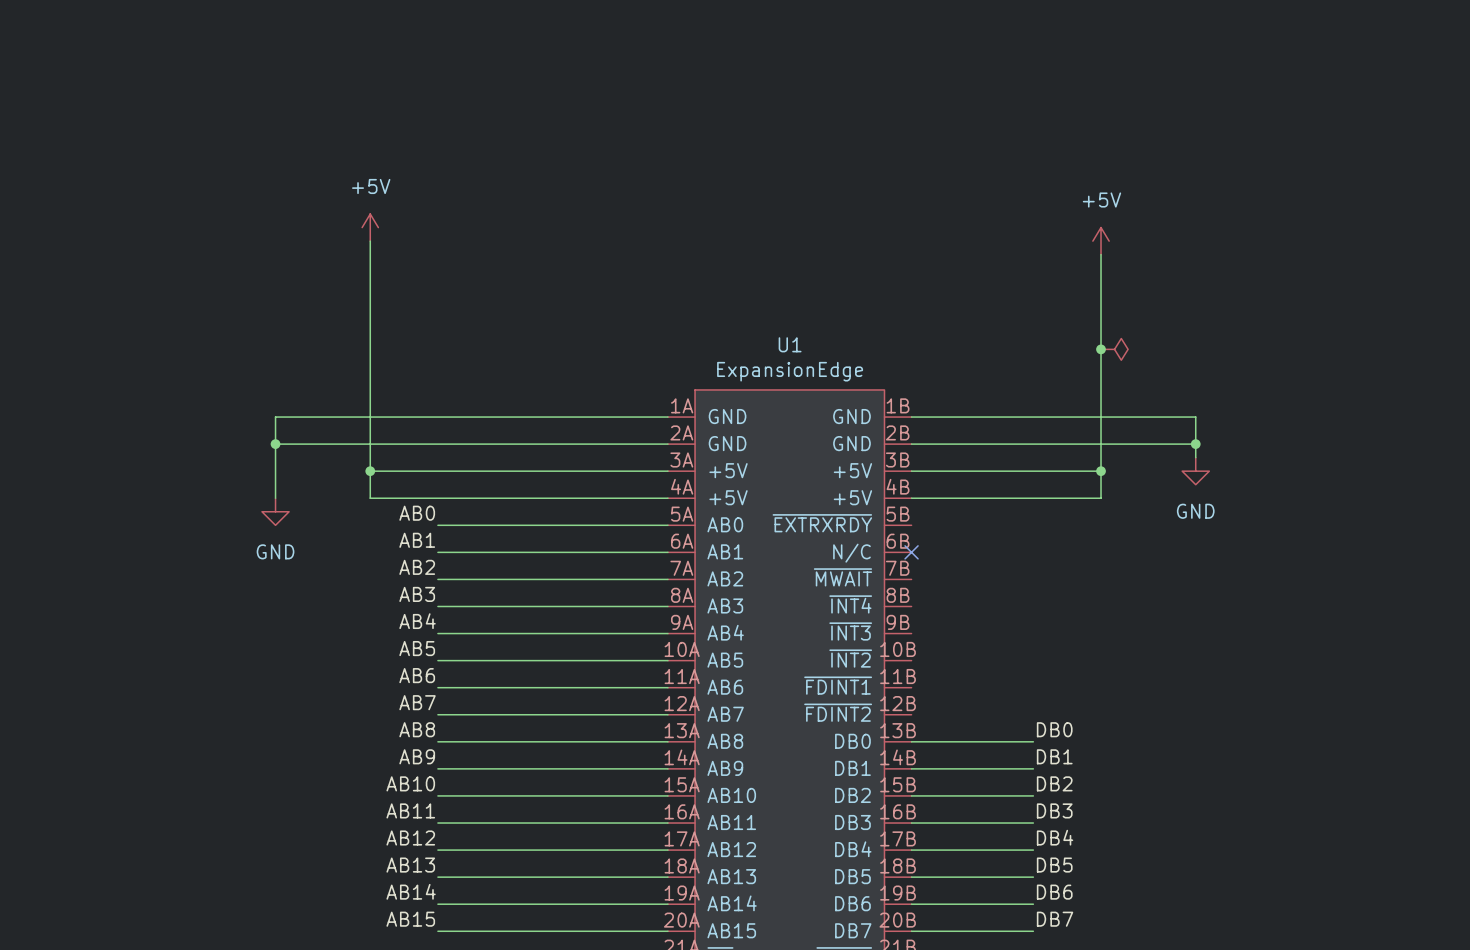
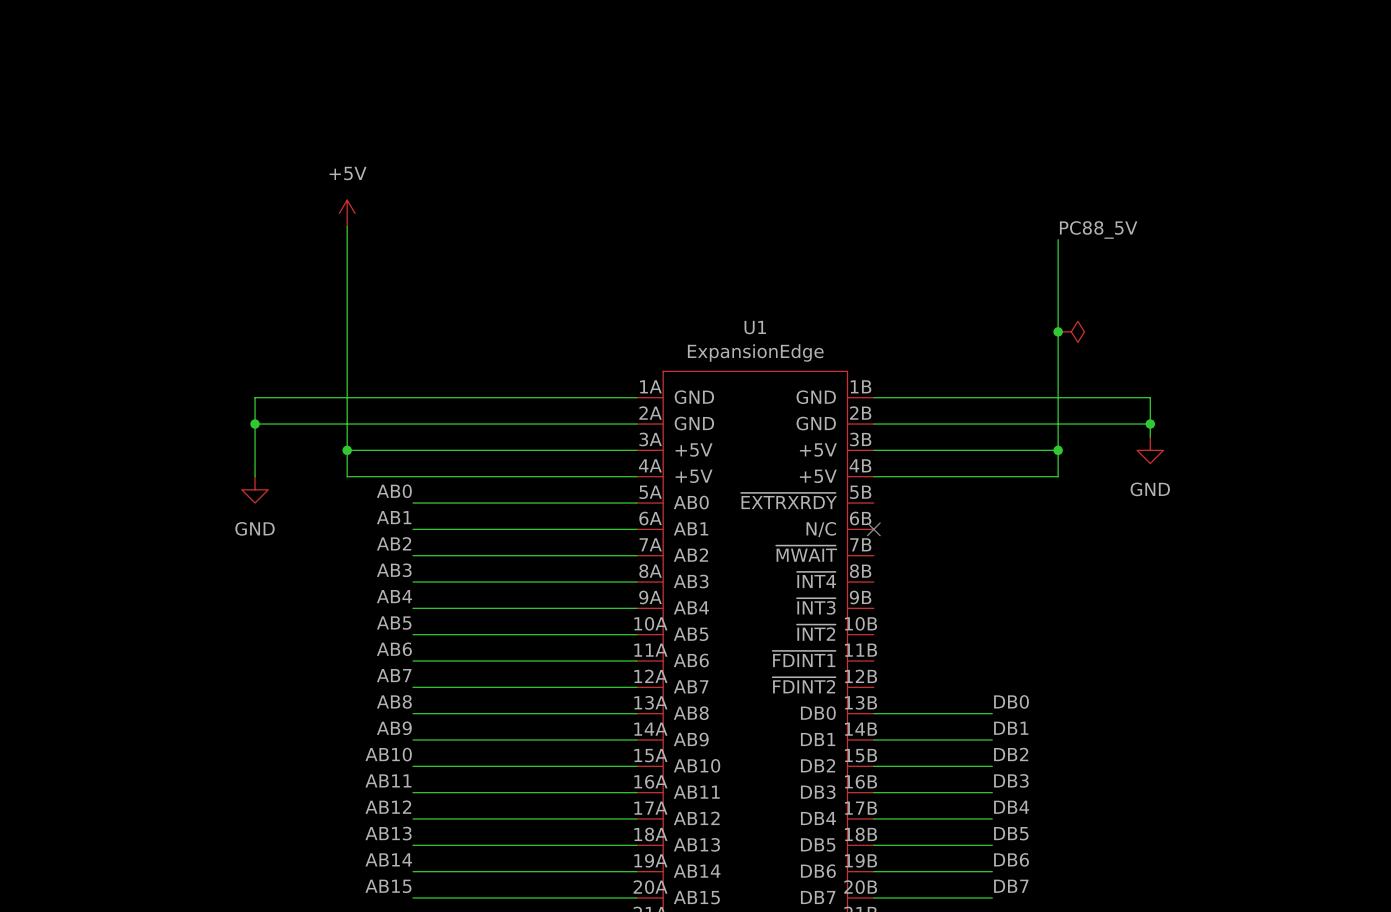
power symbol: +5V (1101, 241) -> none
label: none -> PC88_5V (1098, 229)

